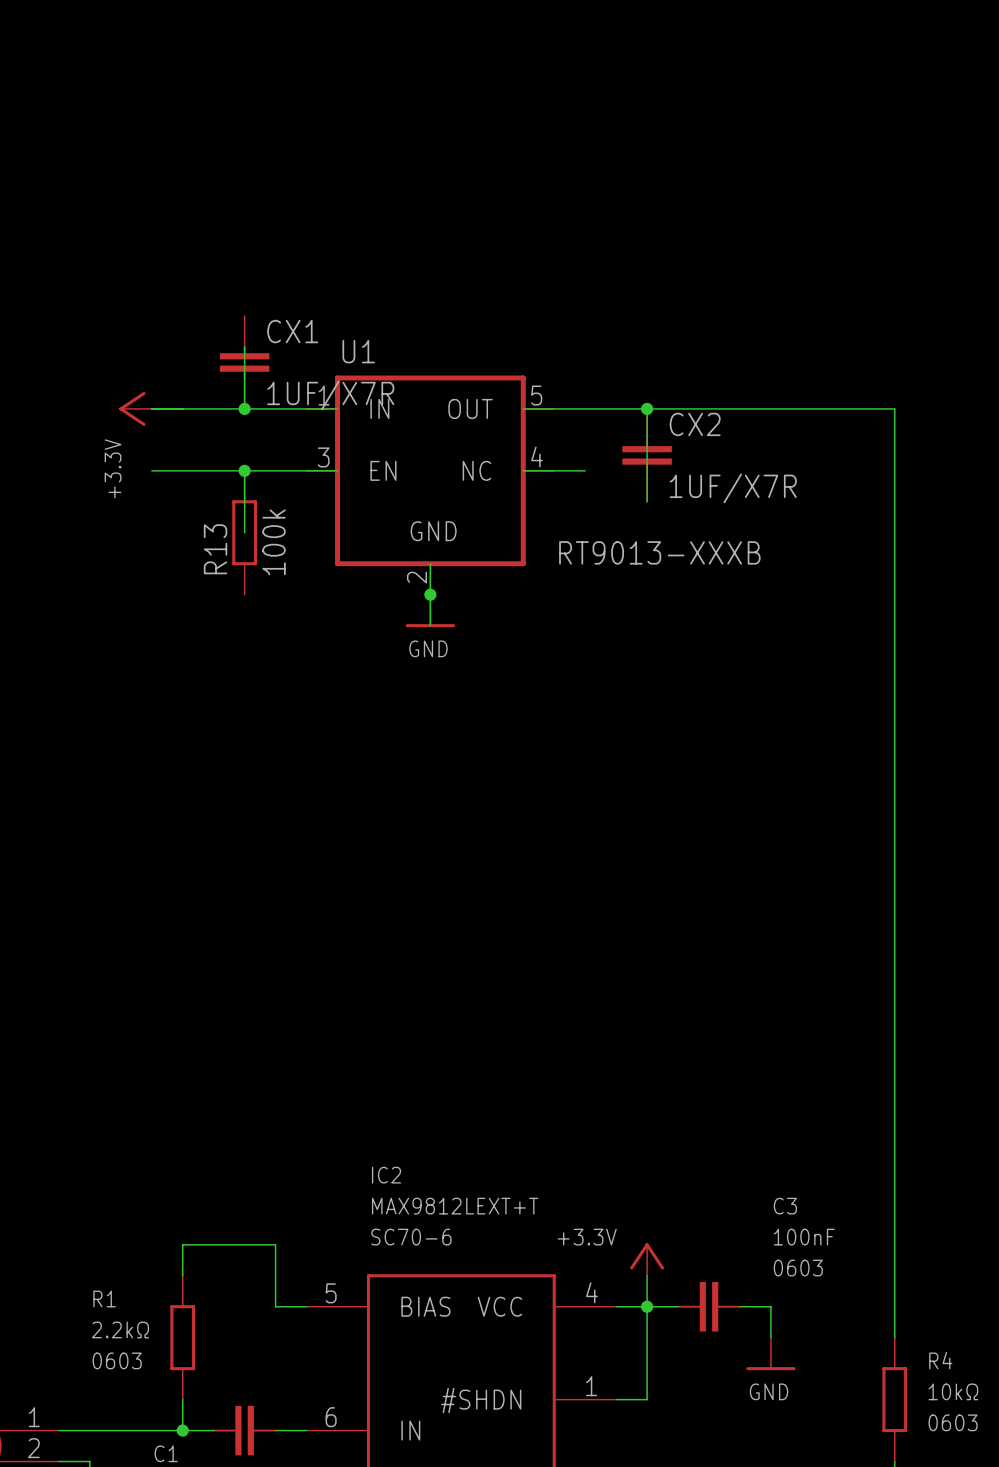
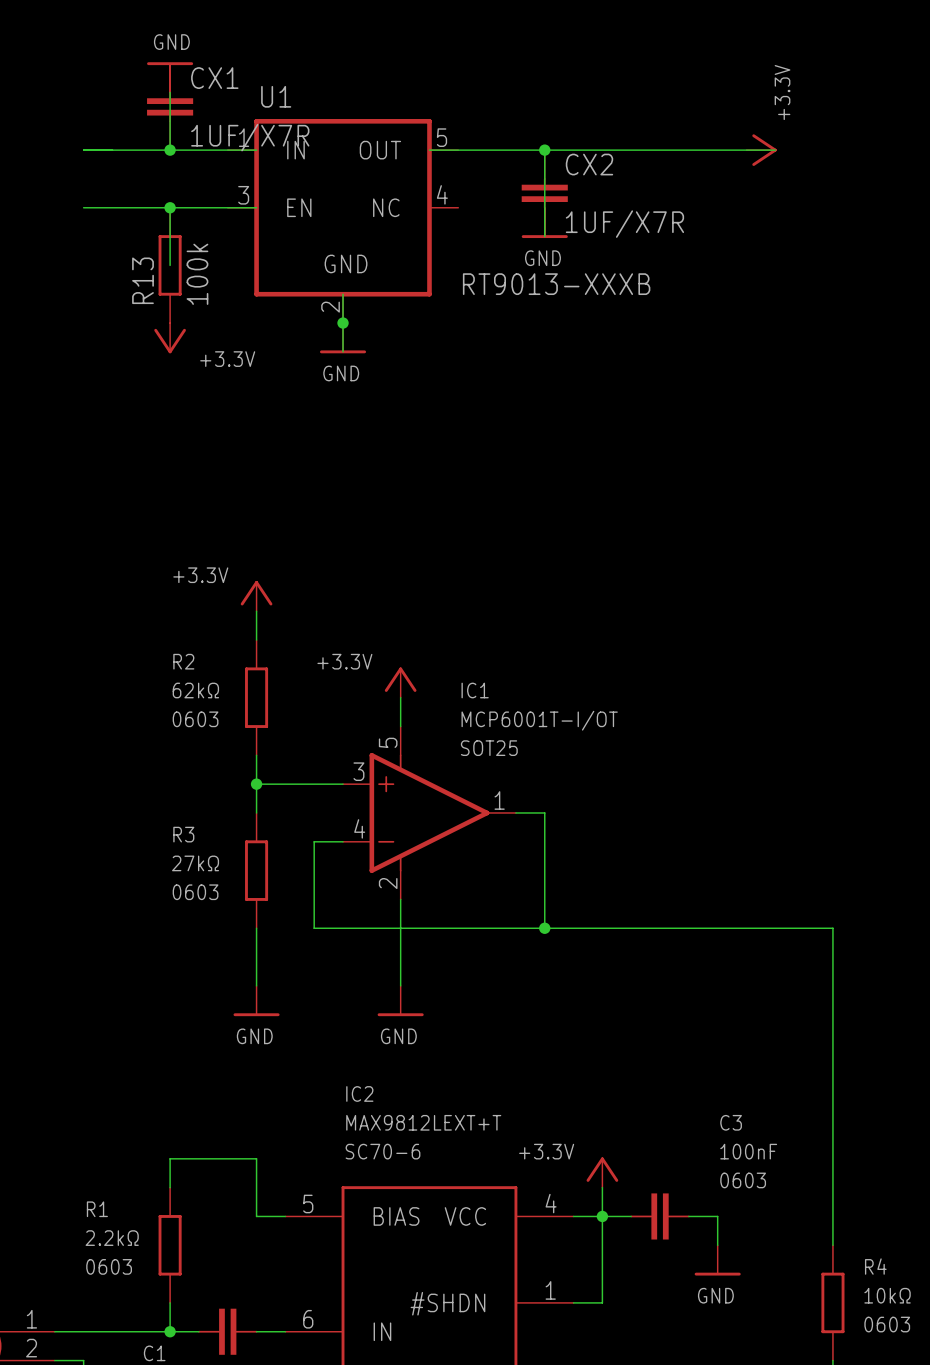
power symbol: none -> GND (170, 77)
junction: none -> (170, 150)
wire: none -> (429, 150) (775, 150)
junction: none -> (544, 150)
power symbol: none -> +3.3V (761, 150)
junction: none -> (170, 207)
power symbol: none -> GND (544, 222)
wire: (244, 347) (244, 408) -> (170, 92) (170, 150)
junction: none -> (343, 323)
CX1 position: (244, 362) -> (170, 106)
power symbol: none -> GND (343, 338)
power symbol rotation: 0° (132, 408) -> 90° counterclockwise (170, 341)
power symbol position: +3.3V (135, 408) -> +3.3V (170, 338)
wire: (151, 408) (337, 408) -> (83, 150) (256, 150)
junction: (244, 408) -> none
wire: (523, 408) (894, 408) (894, 997) -> (343, 841) (314, 841) (314, 928) (832, 928)
wire: (647, 408) (647, 501) -> (544, 150) (544, 236)
junction: (647, 408) -> none
CX2 position: (647, 455) -> (544, 193)
wire: (151, 470) (337, 470) -> (83, 207) (256, 207)
wire: (244, 470) (244, 532) -> (170, 207) (170, 265)
junction: (244, 470) -> none
wire: (523, 470) (585, 470) -> none
U1 position: (430, 485) -> (343, 221)
R13 position: (244, 532) -> (170, 265)
wire: (430, 563) (430, 625) -> (343, 294) (343, 351)
junction: (430, 594) -> none
power symbol: GND (430, 610) -> none
power symbol: none -> +3.3V (256, 596)
wire: none -> (256, 611) (256, 640)
power symbol: none -> +3.3V (400, 682)
R2: none -> 62kΩ (256, 697)
wire: none -> (400, 697) (400, 726)
wire: none -> (256, 755) (256, 812)
wire: none -> (256, 784) (343, 784)
junction: none -> (256, 784)
IC1: none -> MCP6001T-I/OT (429, 812)
wire: none -> (515, 812) (544, 812) (544, 928)
R3: none -> 27kΩ (256, 870)
wire: none -> (400, 899) (400, 985)
wire: none -> (256, 928) (256, 985)
junction: none -> (544, 928)
power symbol: none -> GND (256, 1001)
power symbol: none -> GND (400, 1001)

